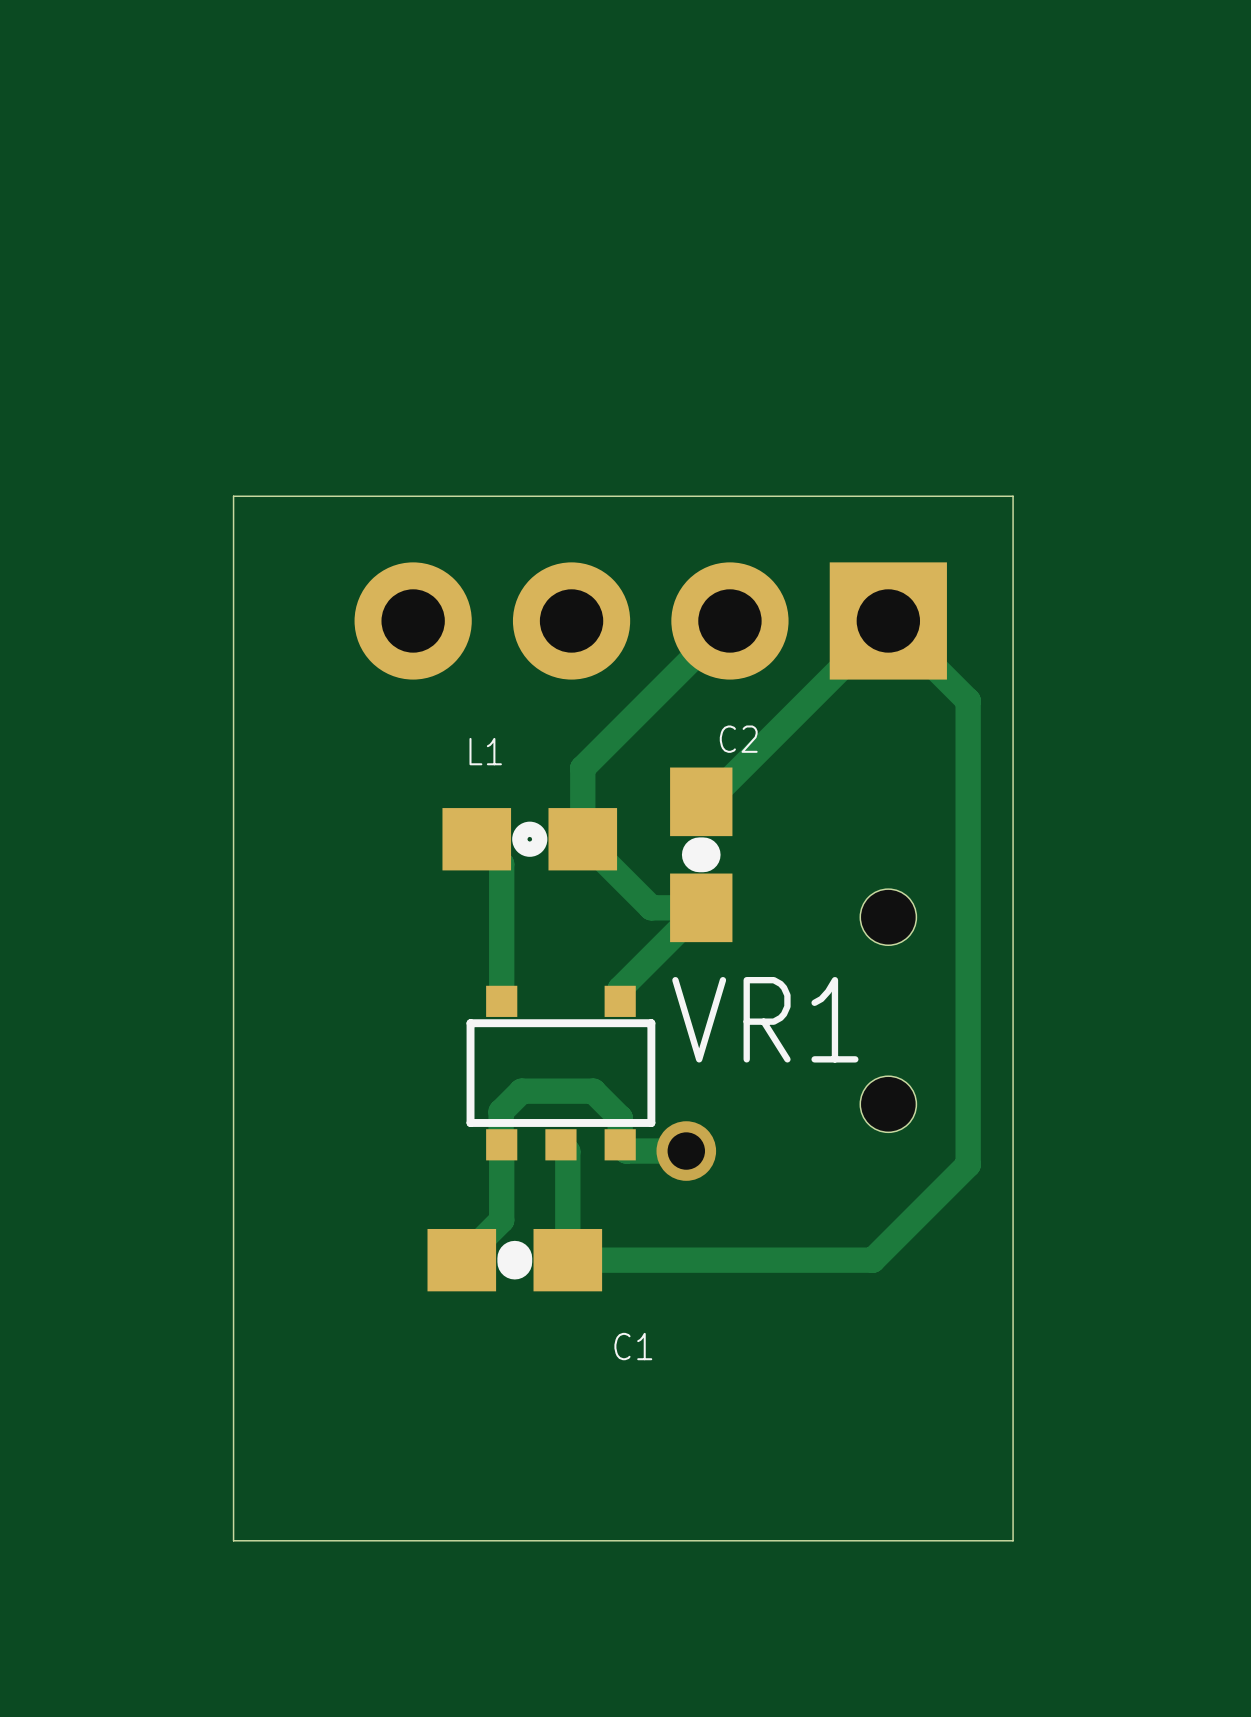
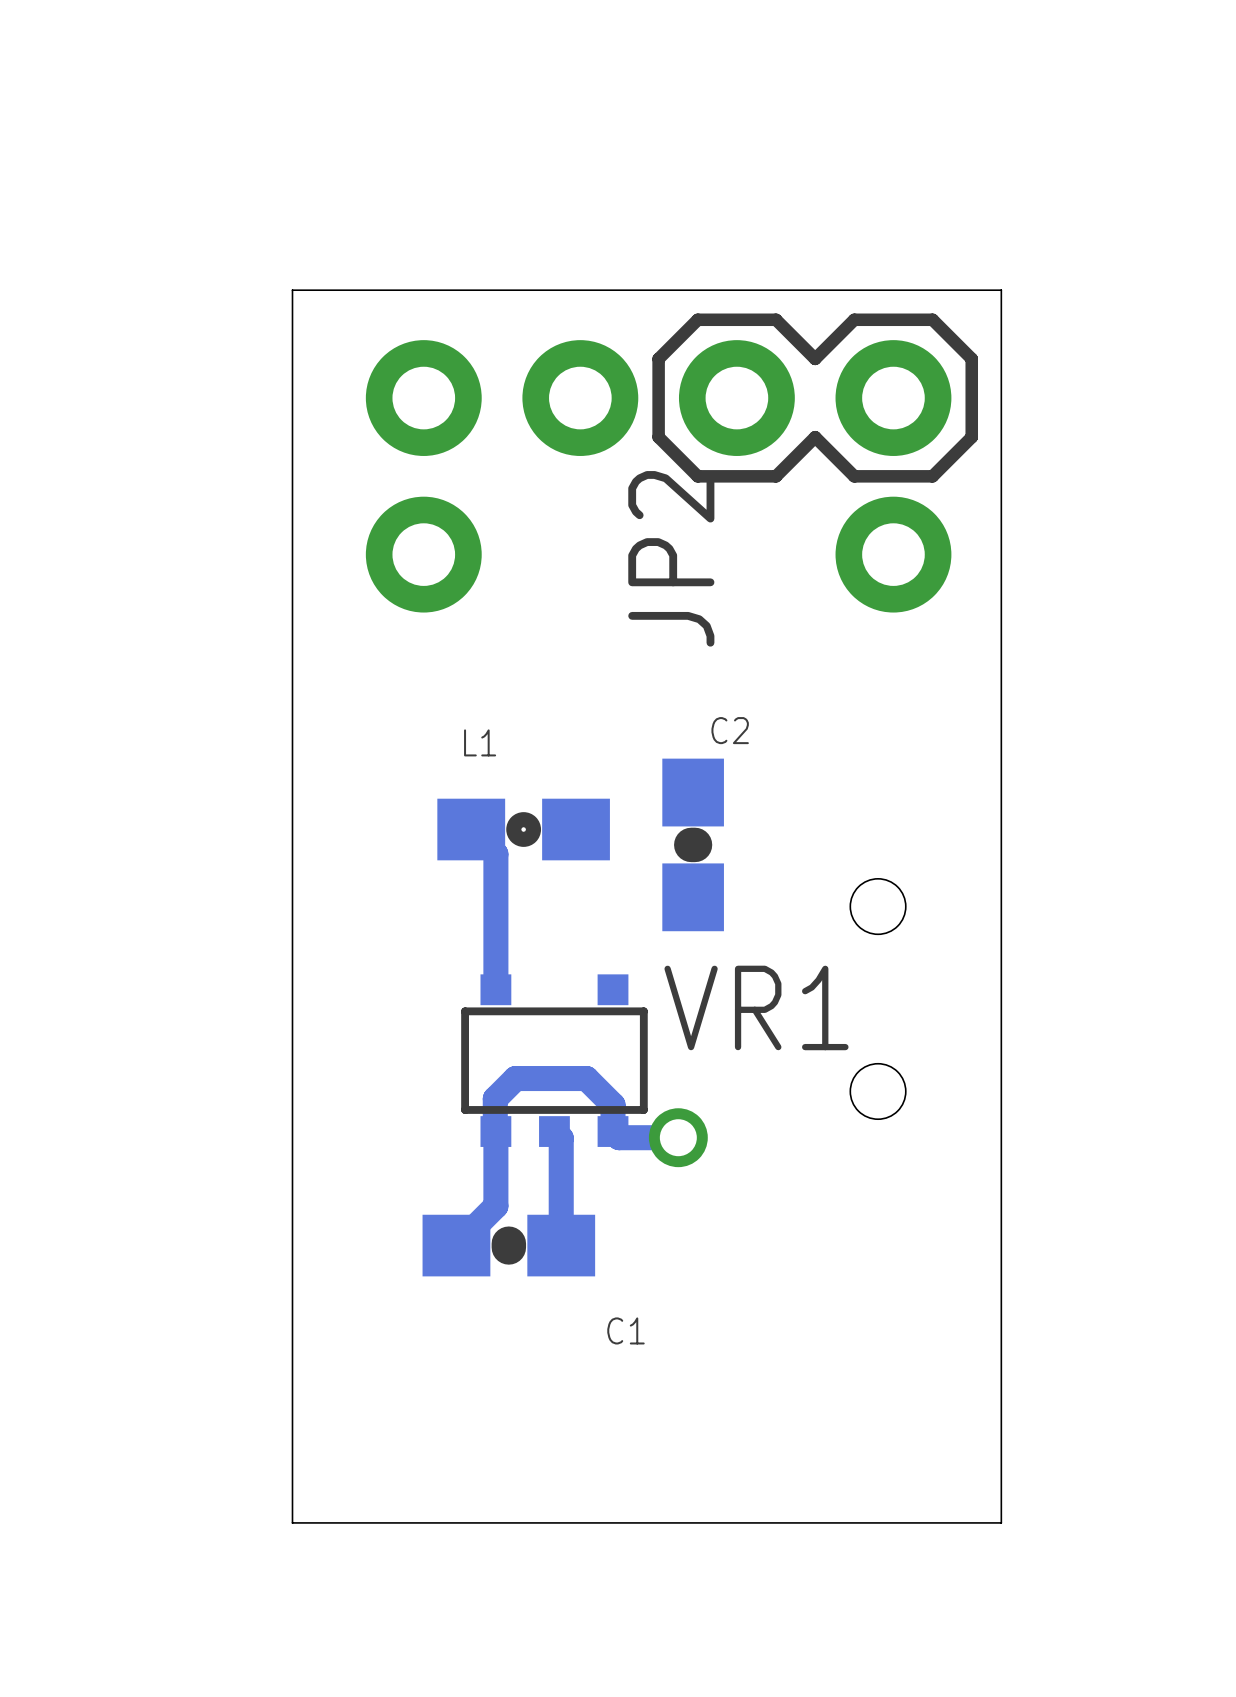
part: none -> (502, 398)
JP2: none -> (815, 398)
board edge: (1013, 496) (233, 496) (233, 1540) (295, 1540) -> (1001, 490) (1001, 290) (292, 290) (292, 1522)
part: none -> (423, 554)
part: none -> (893, 554)
part: (650, 620) -> none
track: (729, 620) (582, 768) (582, 839) (651, 907) (701, 907) (620, 988) (620, 1001) -> none
track: (701, 801) (707, 801) (888, 620) (968, 700) (968, 1164) (872, 1260) (567, 1260) -> none

